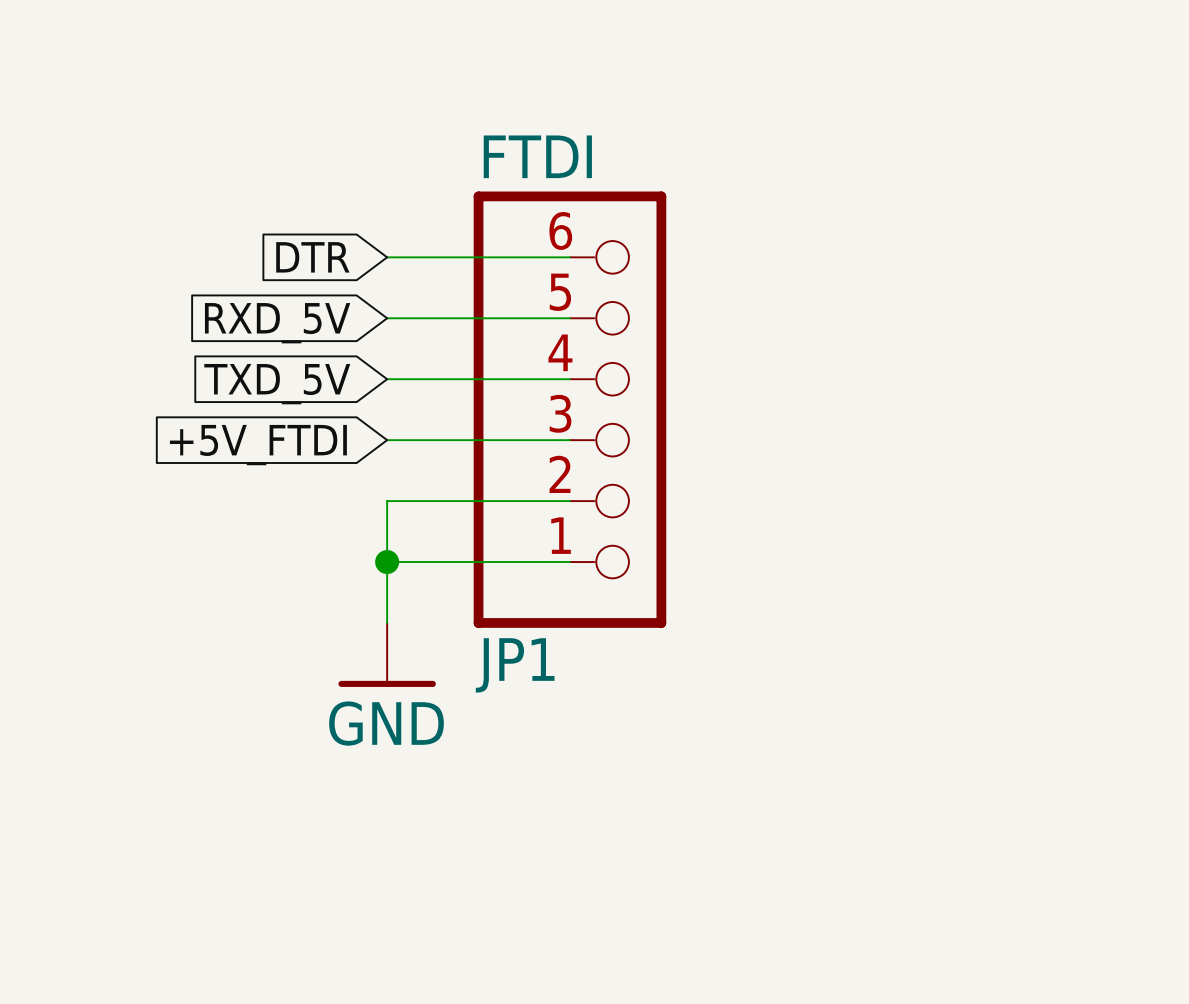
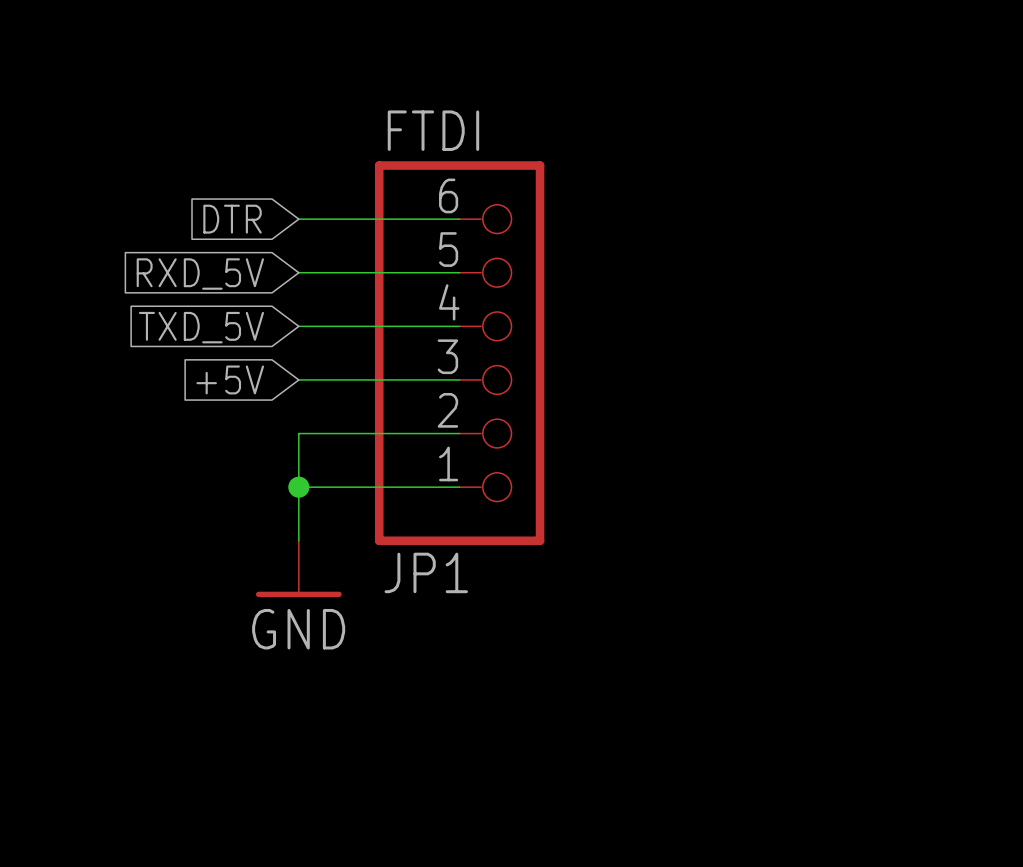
global label: +5V_FTDI (258, 445) -> +5V (230, 379)

